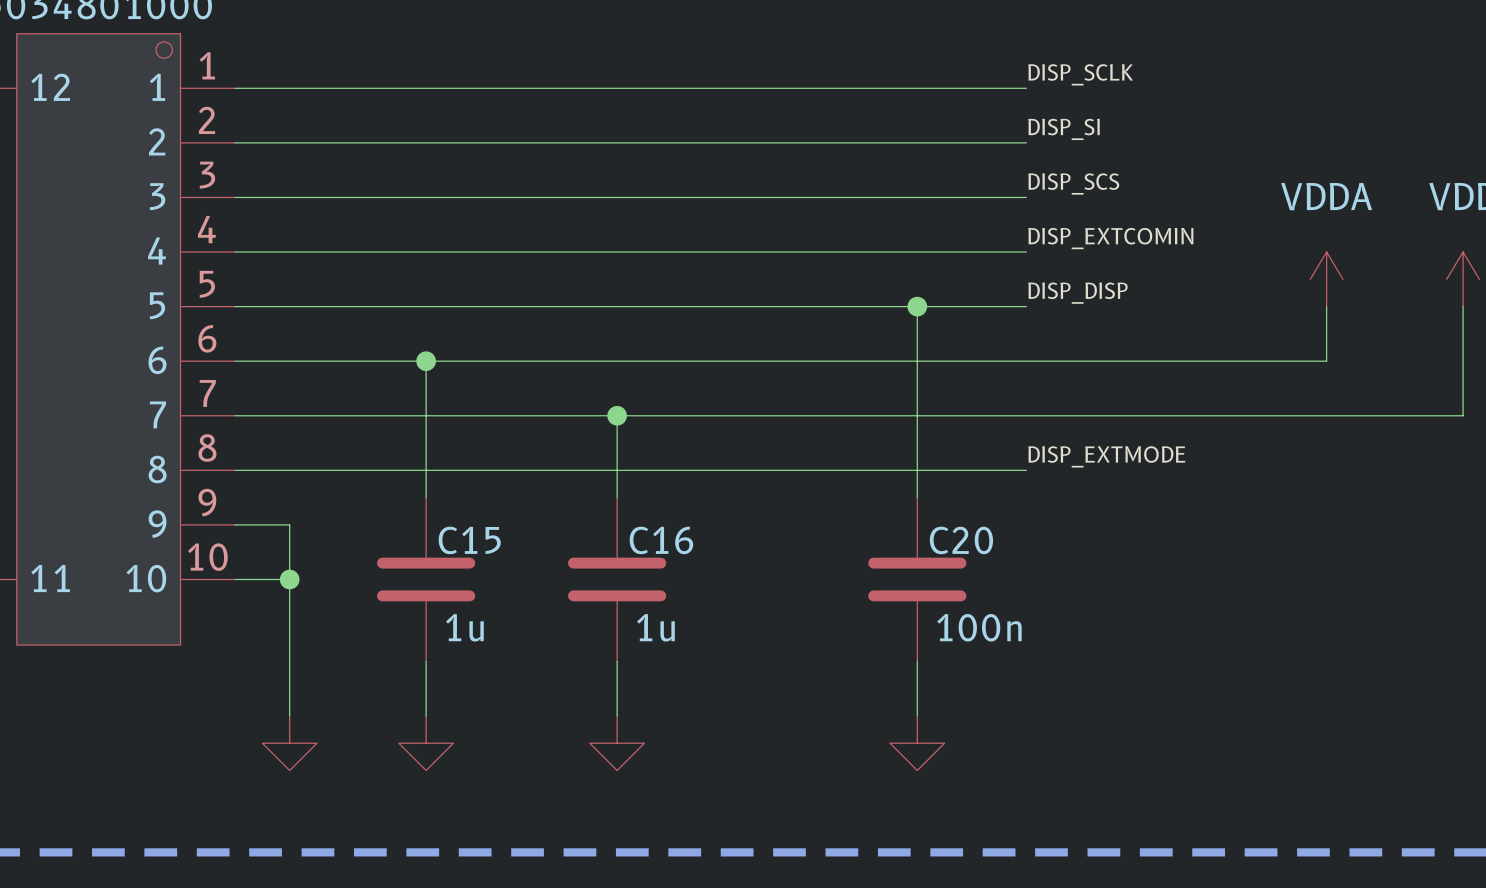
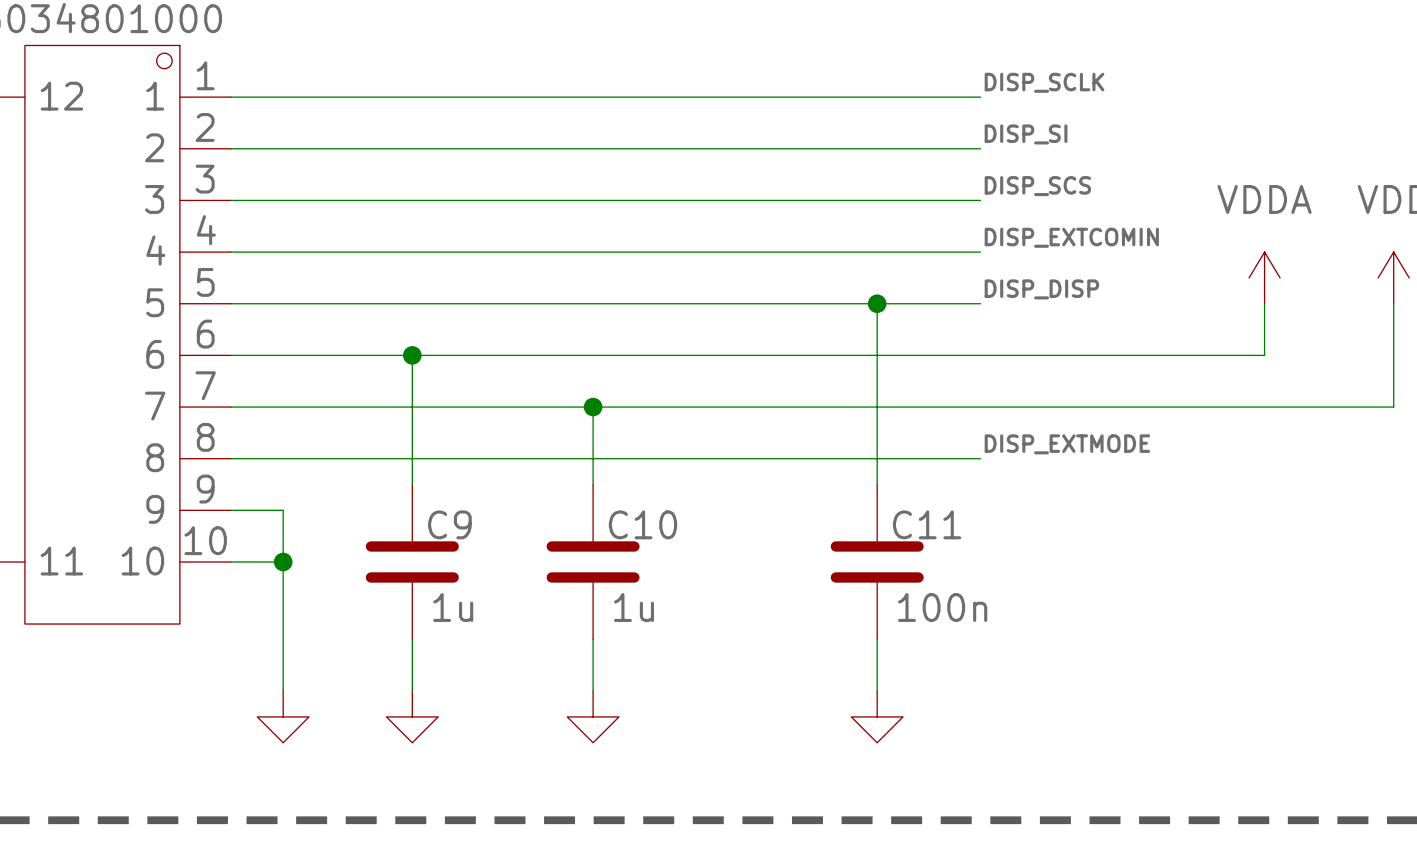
C15 name: C15 (469, 540) -> C9 (449, 524)
C16 name: C16 (661, 540) -> C10 (642, 524)
C20 name: C20 (961, 540) -> C11 (927, 524)

